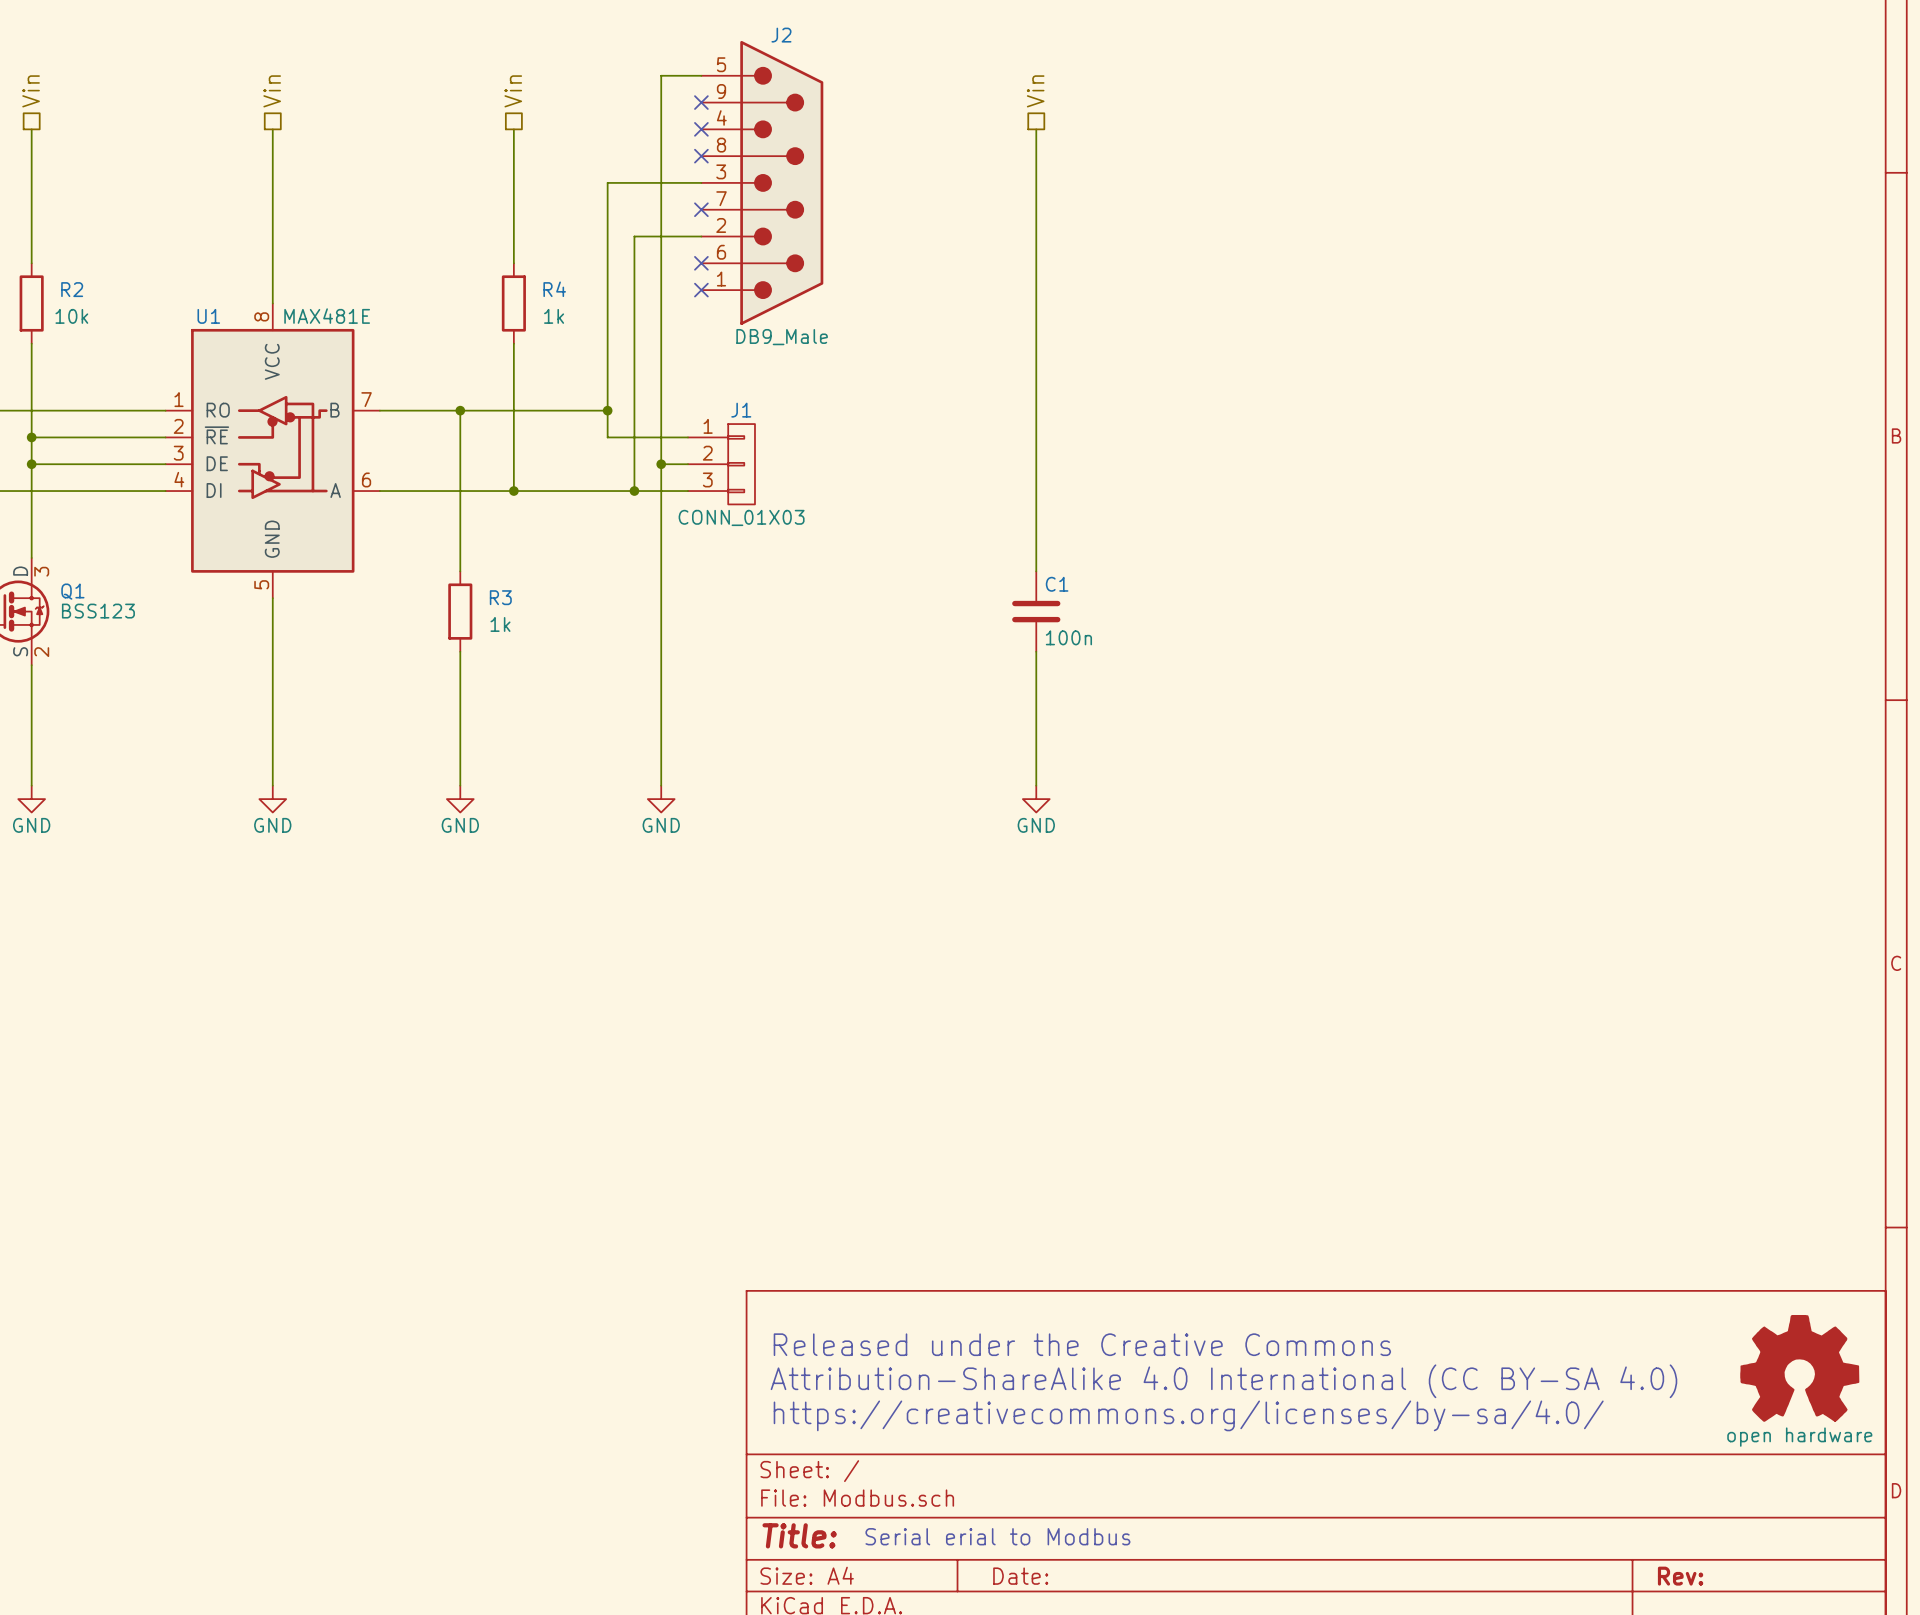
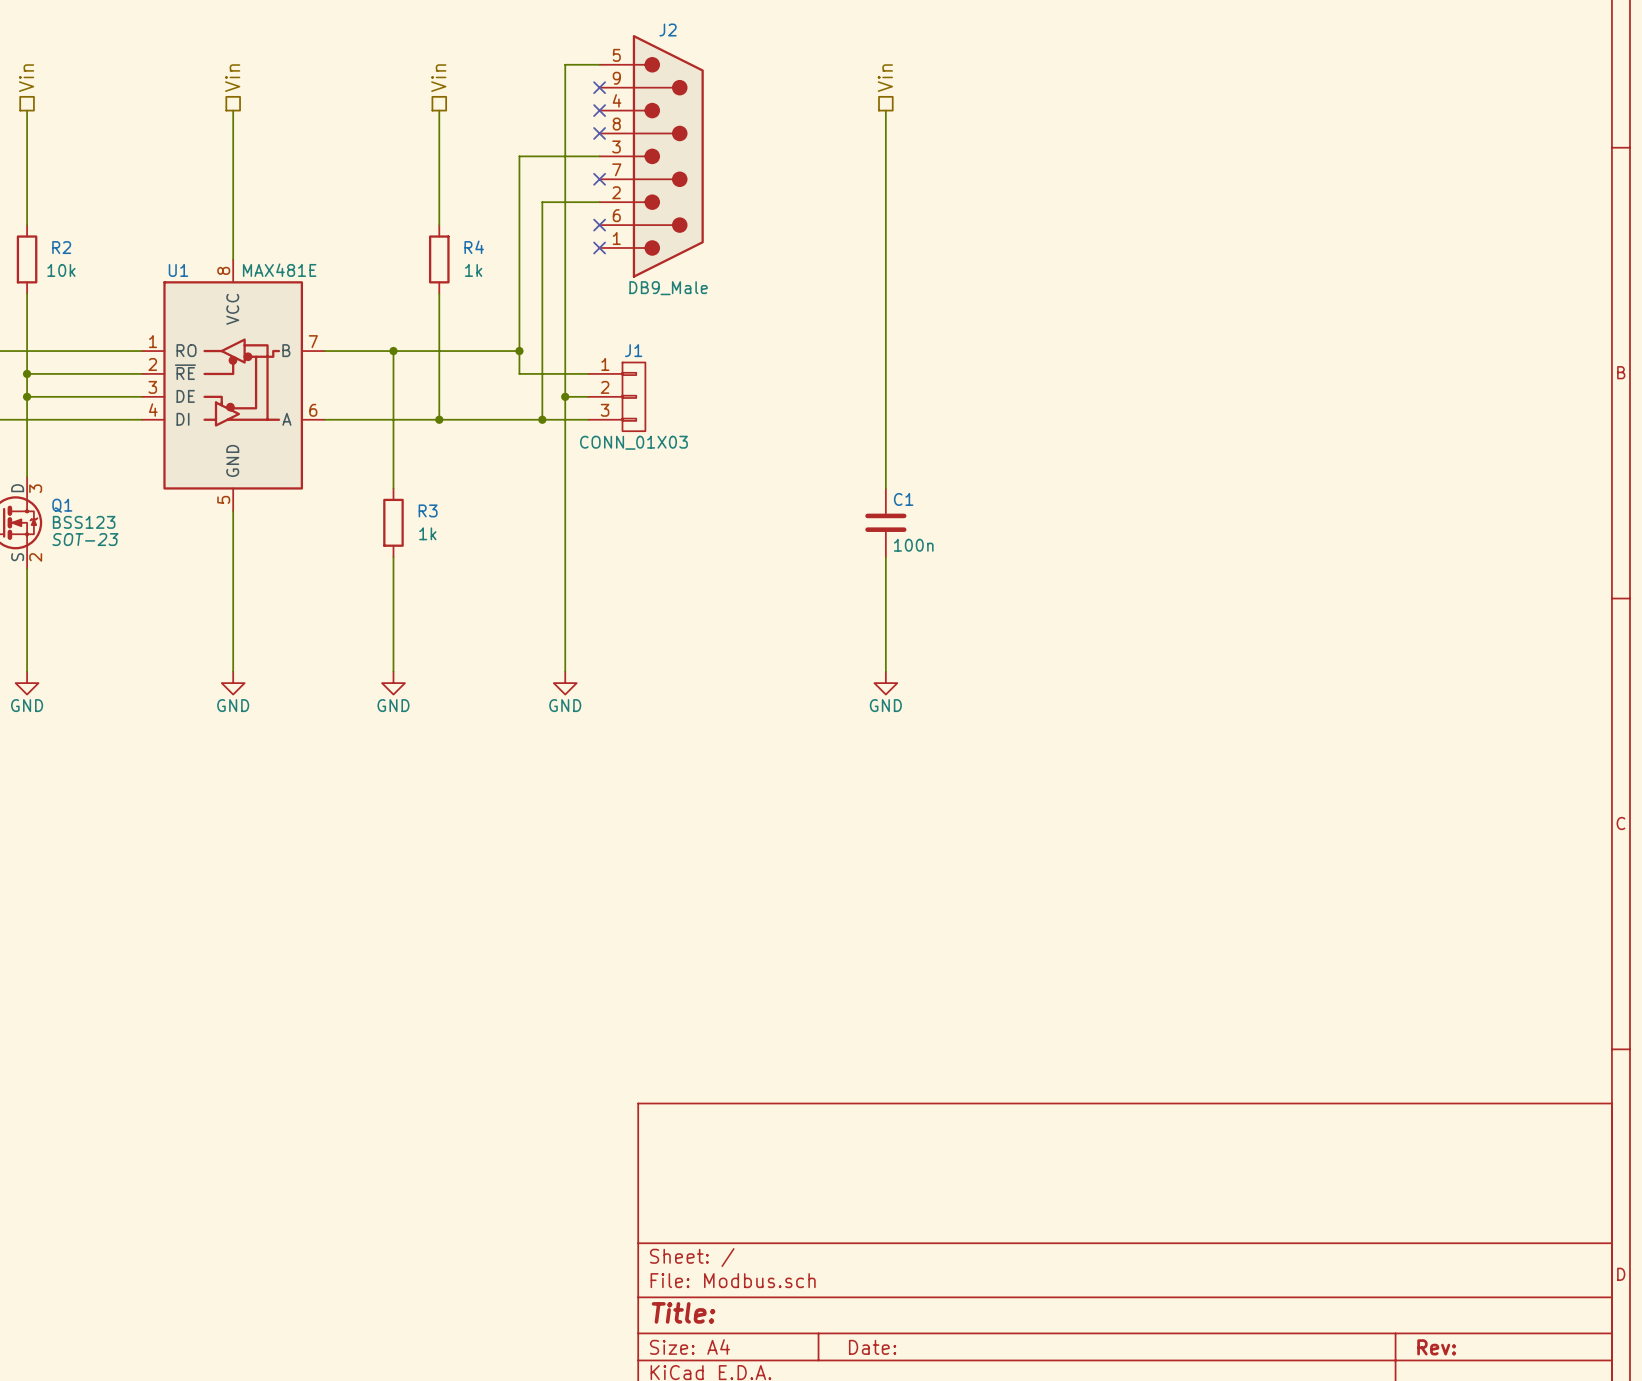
Q1 text: none -> SOT-23 (85, 539)
text: Released under the Creative Commons (1082, 1344) -> none
power symbol: open hardware (1799, 1368) -> none
text: Attribution-ShareAlike 4.0 International (CC BY-SA 4.0) (1223, 1381) -> none
text: https://creativecommons.org/licenses/by-sa/4.0/ (1188, 1415) -> none
text: Serial erial to Modbus (997, 1536) -> none

